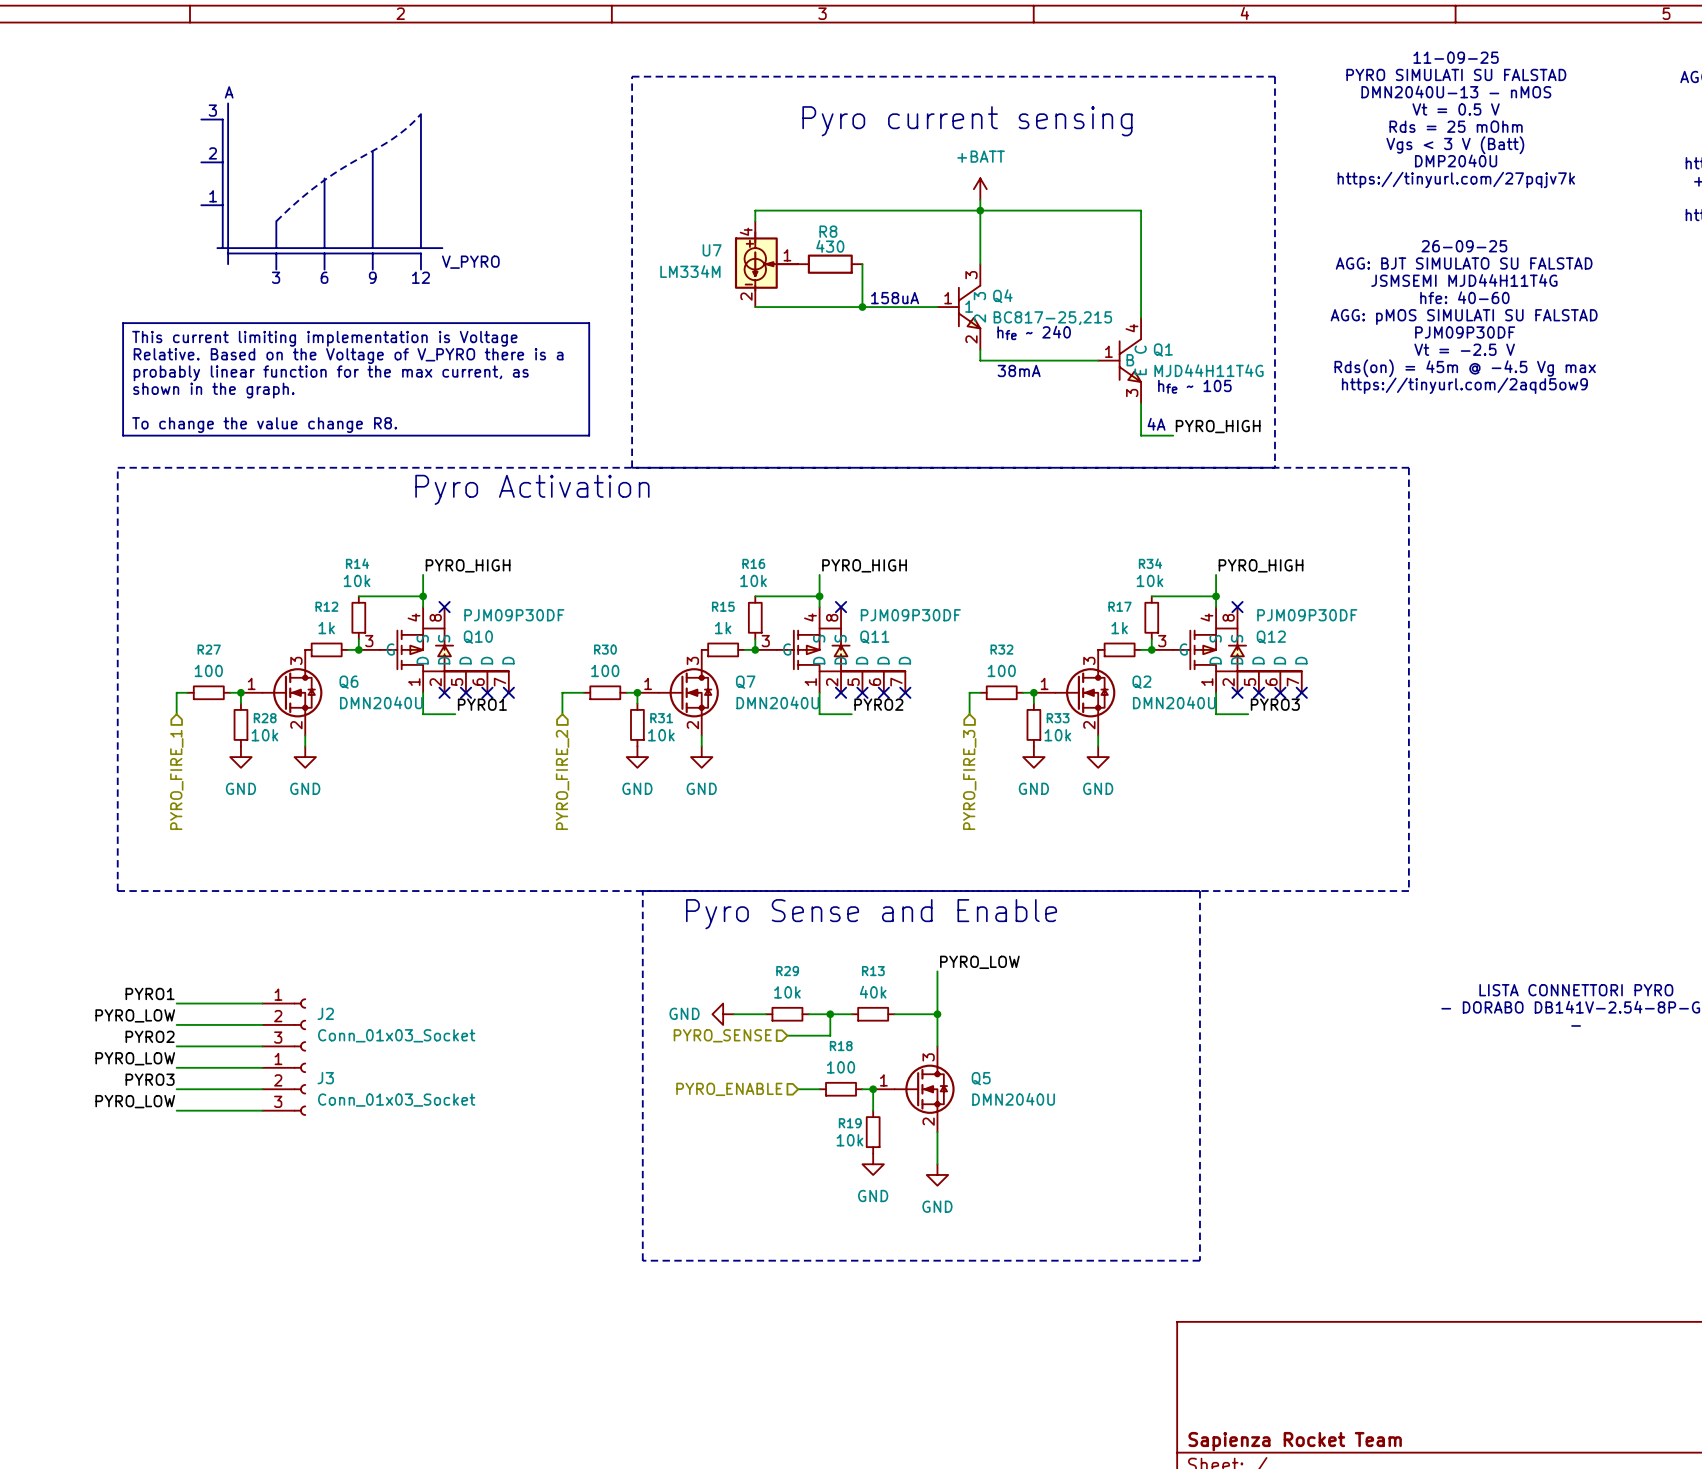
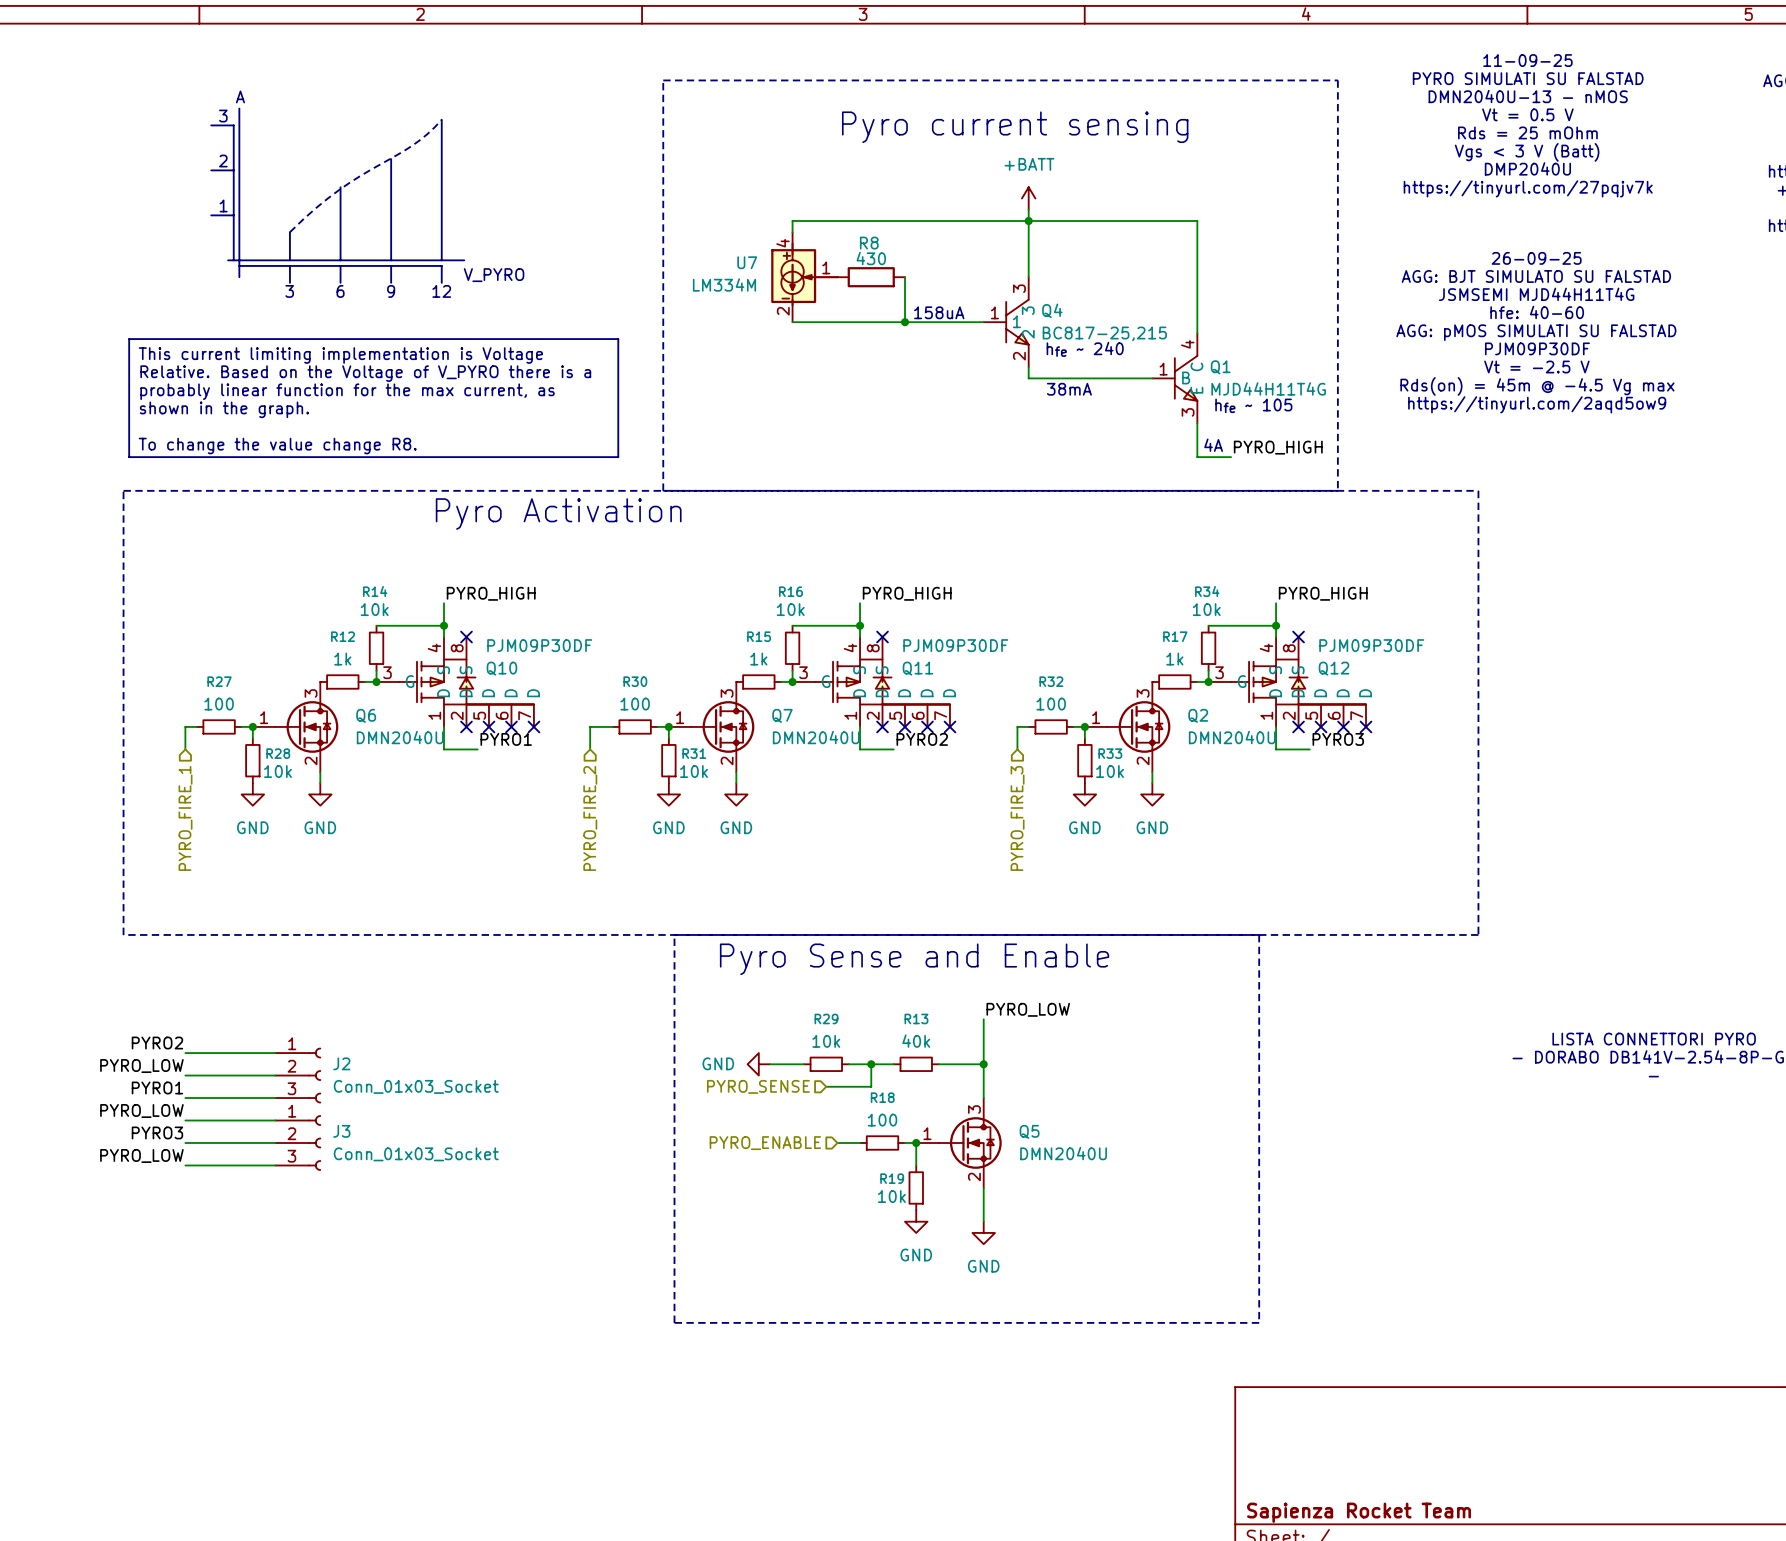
label: PYRO1 (150, 993) -> PYRO2 (157, 1043)
label: PYRO2 (150, 1036) -> PYRO1 (157, 1087)

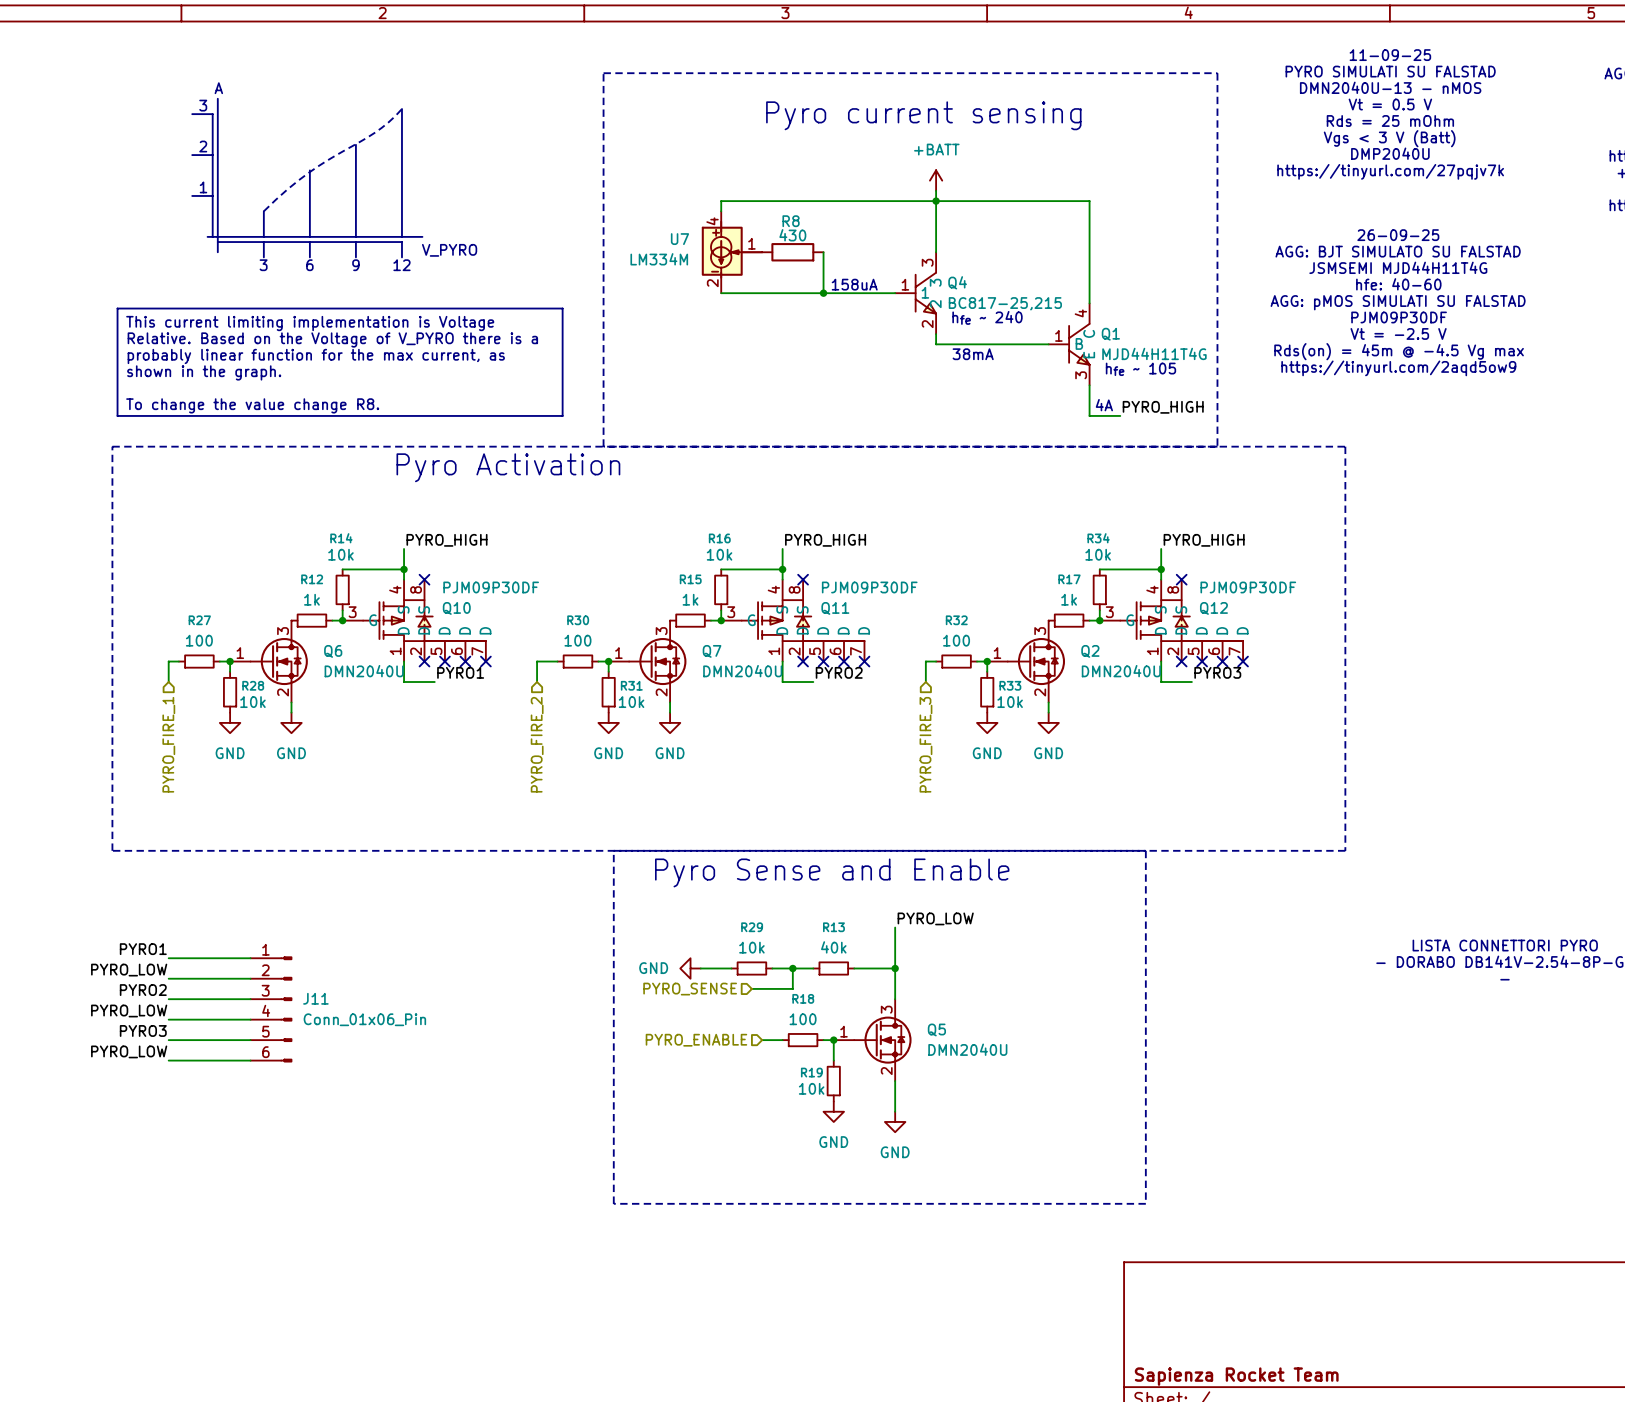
label: PYRO2 (157, 1043) -> PYRO1 (143, 949)
J2: Conn_01x03_Socket (298, 1075) -> none
label: PYRO1 (157, 1087) -> PYRO2 (143, 990)
J11: none -> Conn_01x06_Pin (271, 1009)
J3: Conn_01x03_Socket (298, 1143) -> none

